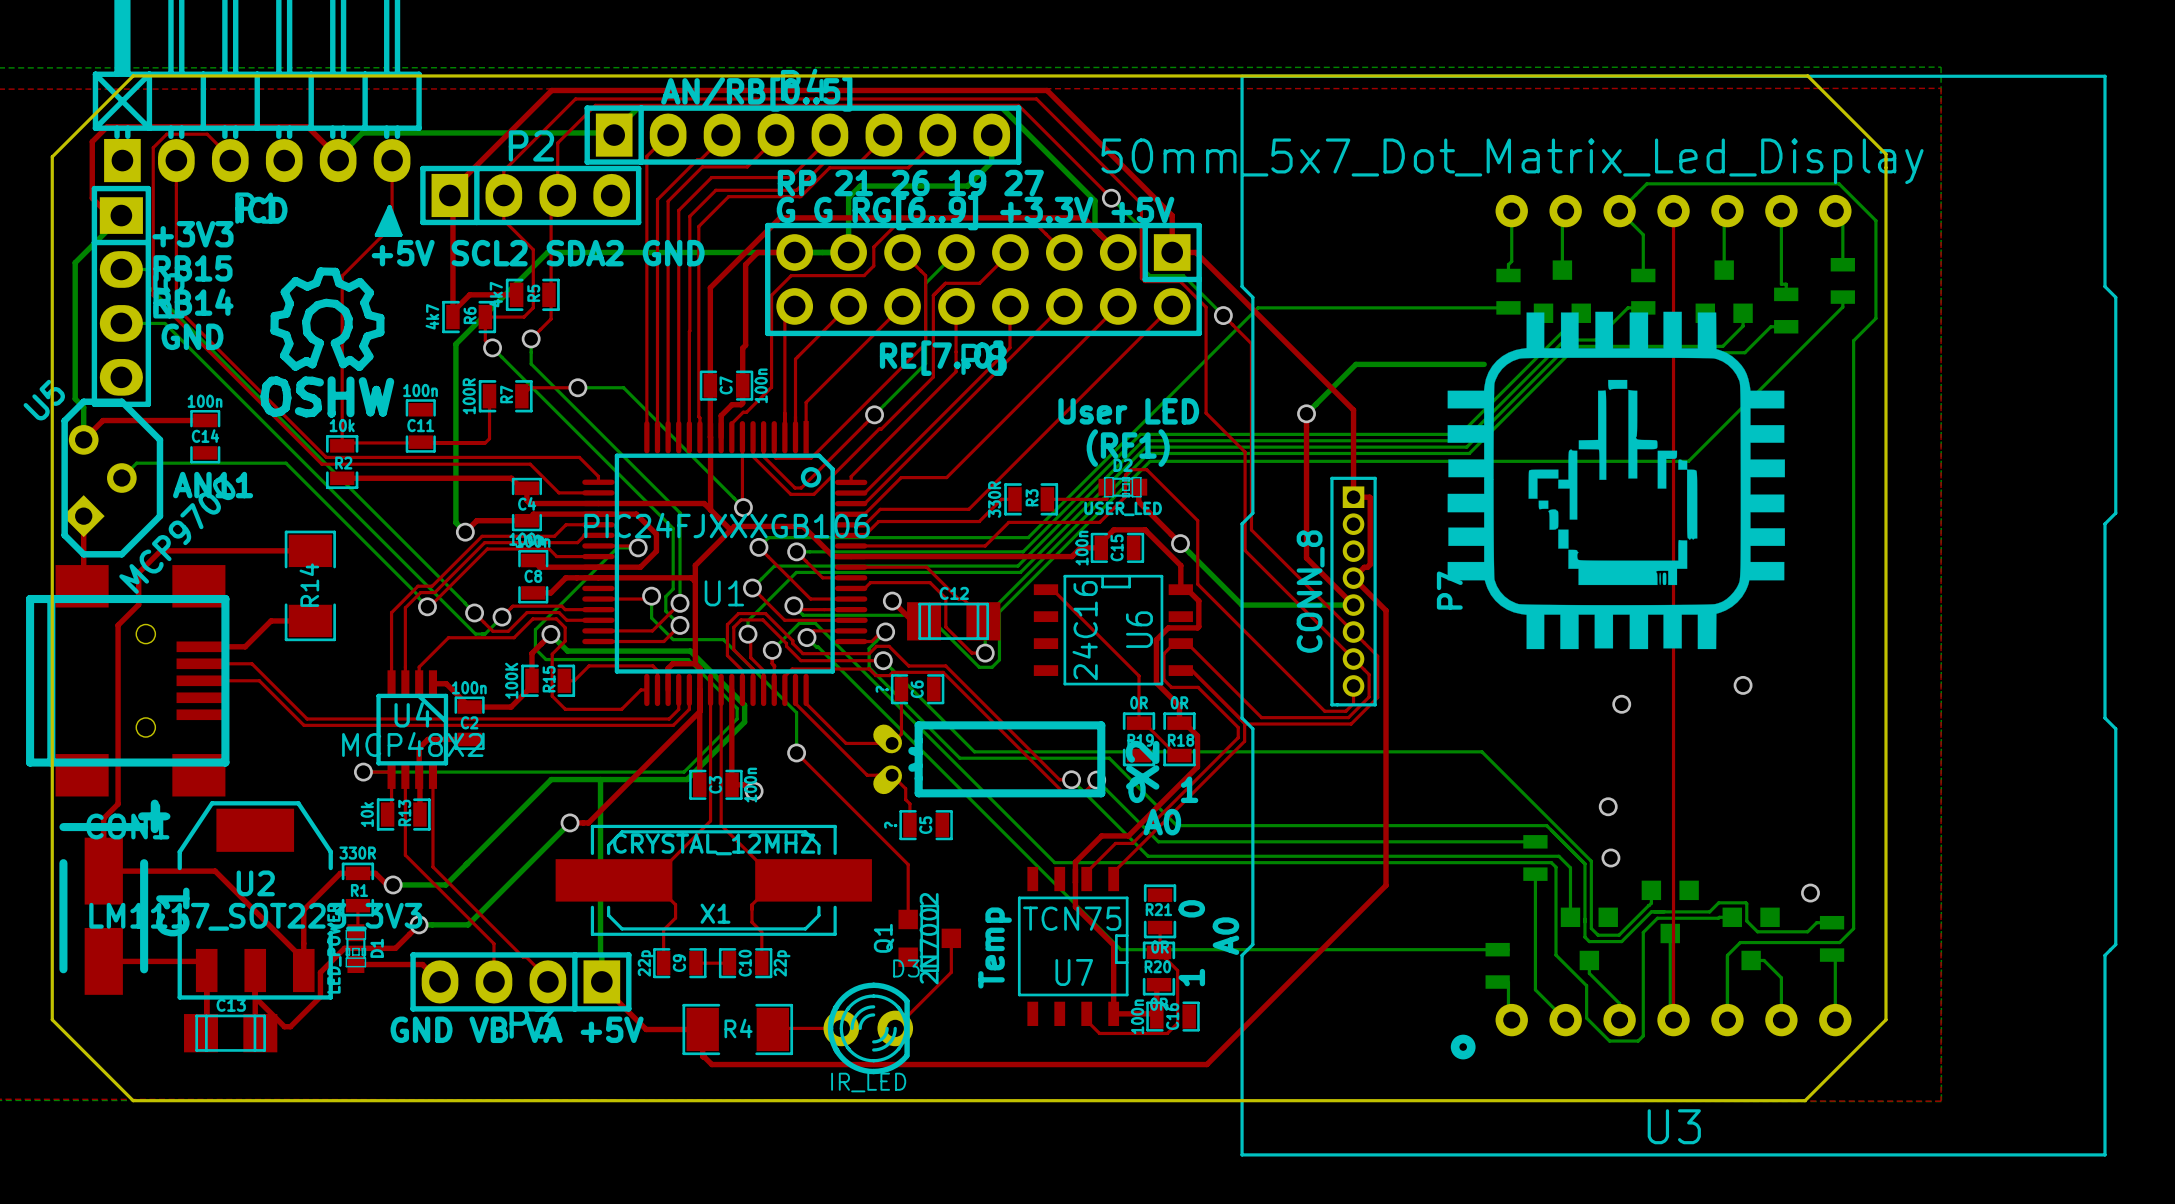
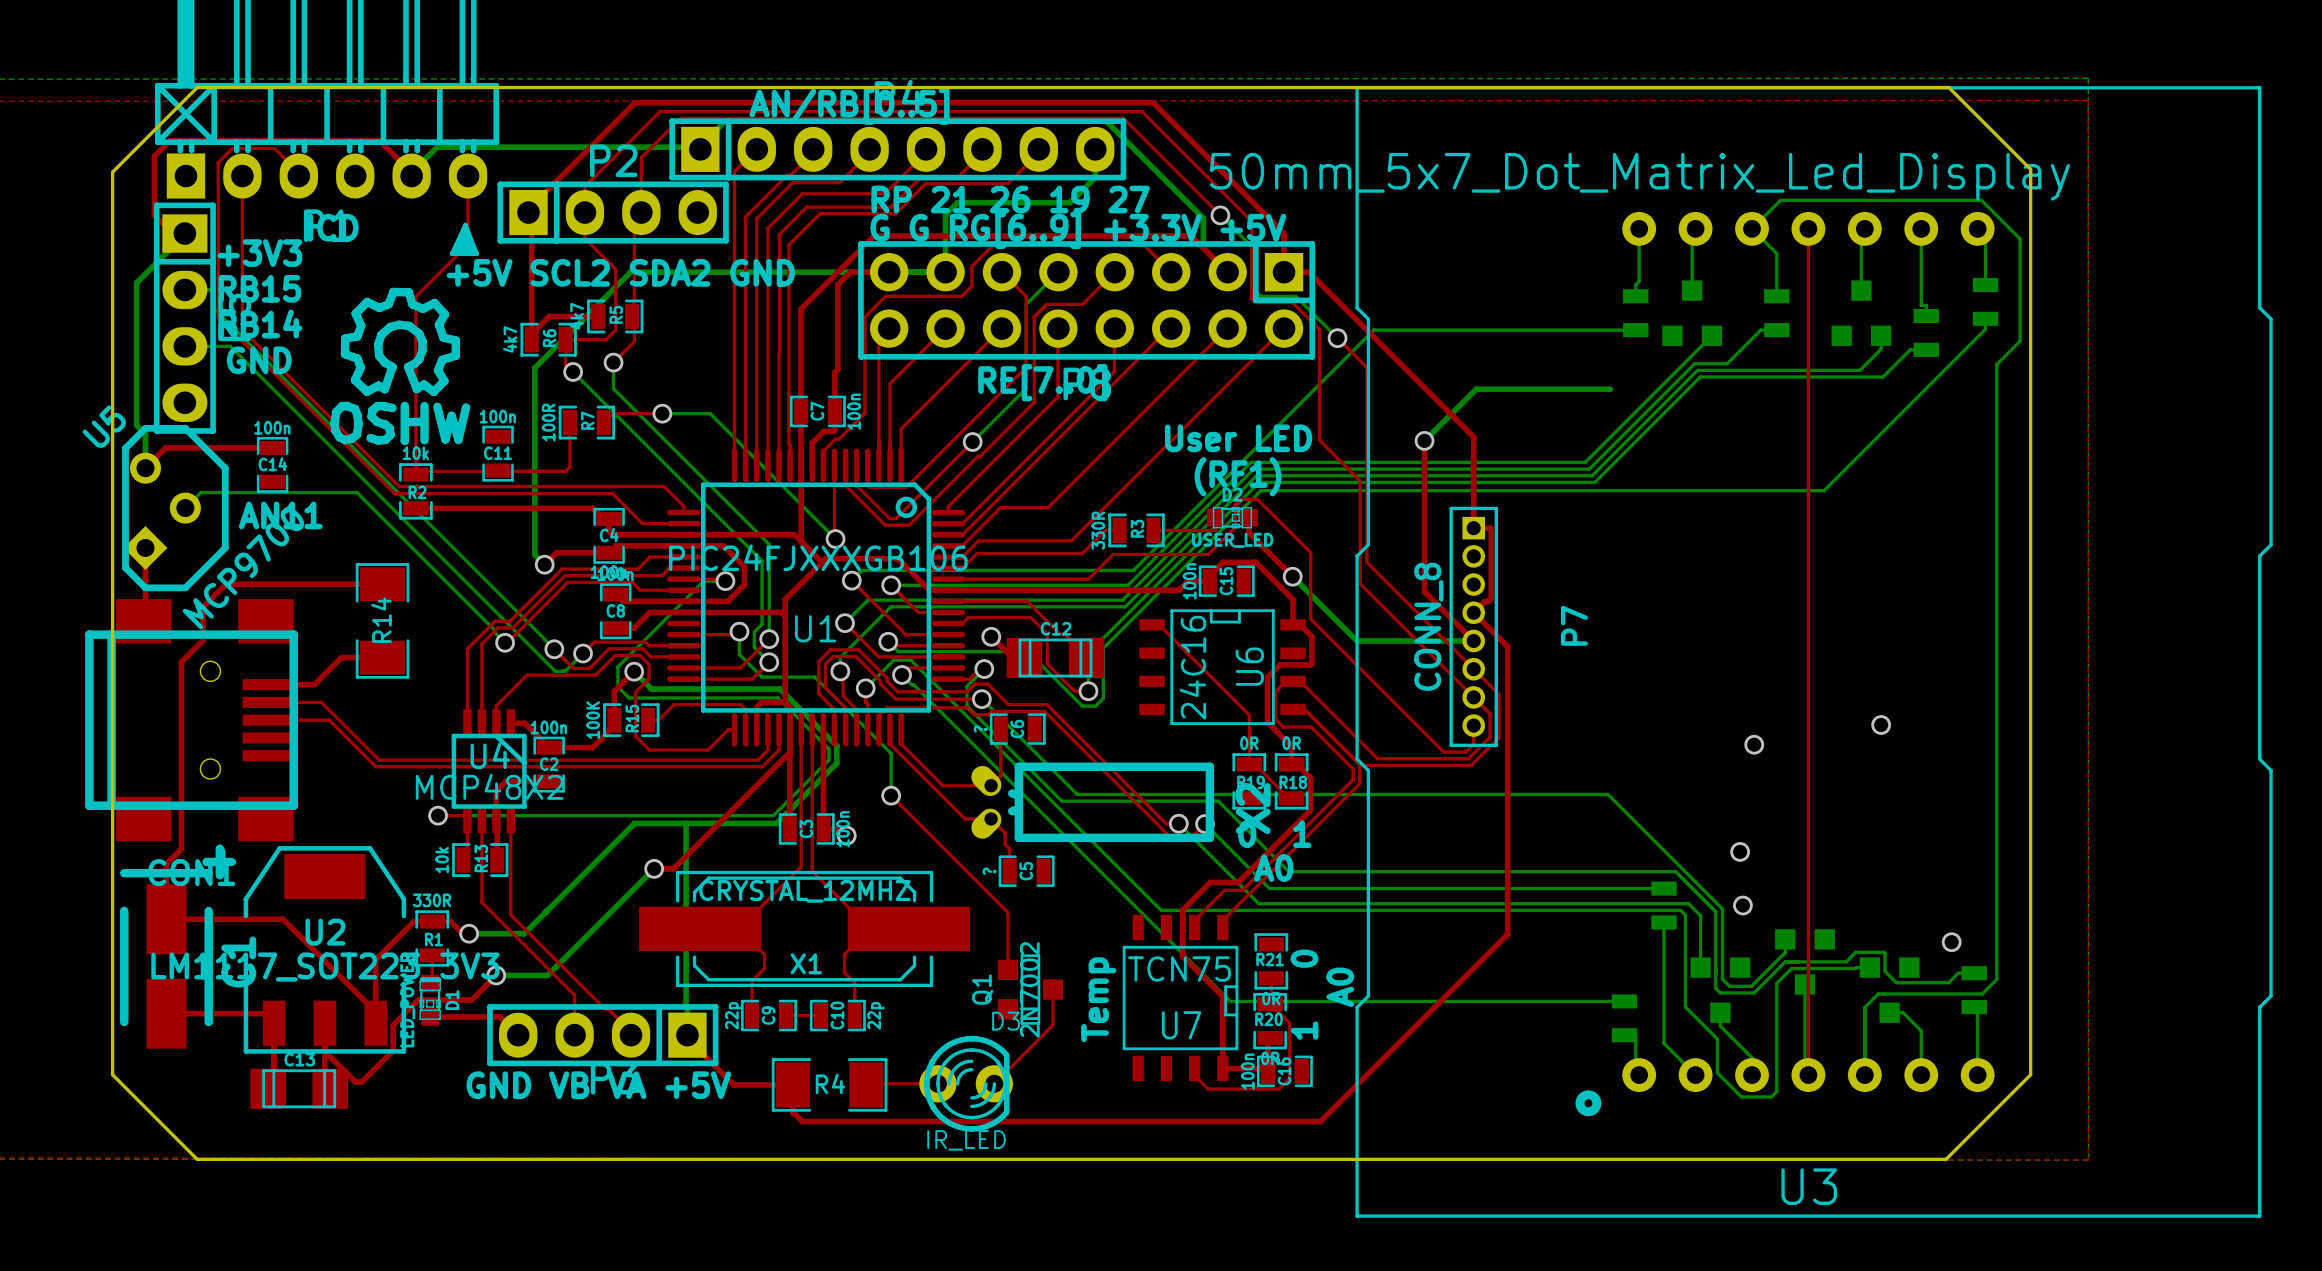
drawing: [1447, 311, 1785, 650] -> none

